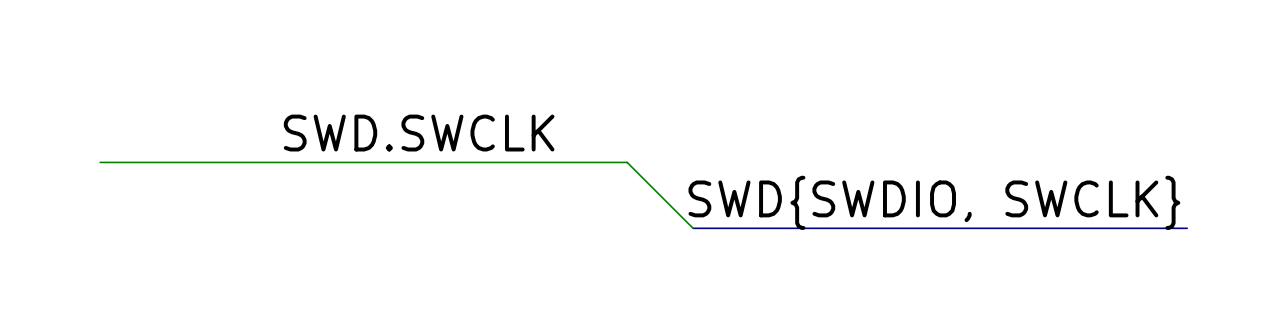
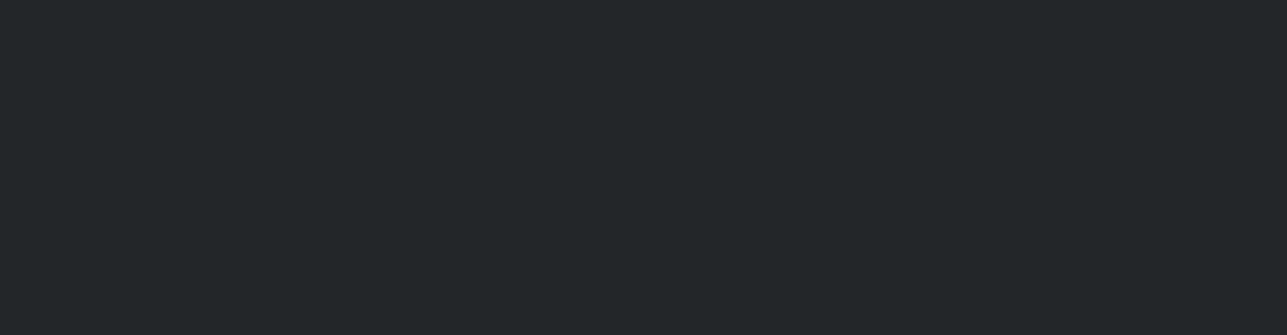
label: SWD.SWCLK (419, 133) -> none
wire: (100, 162) (627, 162) (693, 228) -> none
label: SWD{SWDIO, SWCLK} (934, 202) -> none
bus: (693, 228) (1187, 228) -> none

